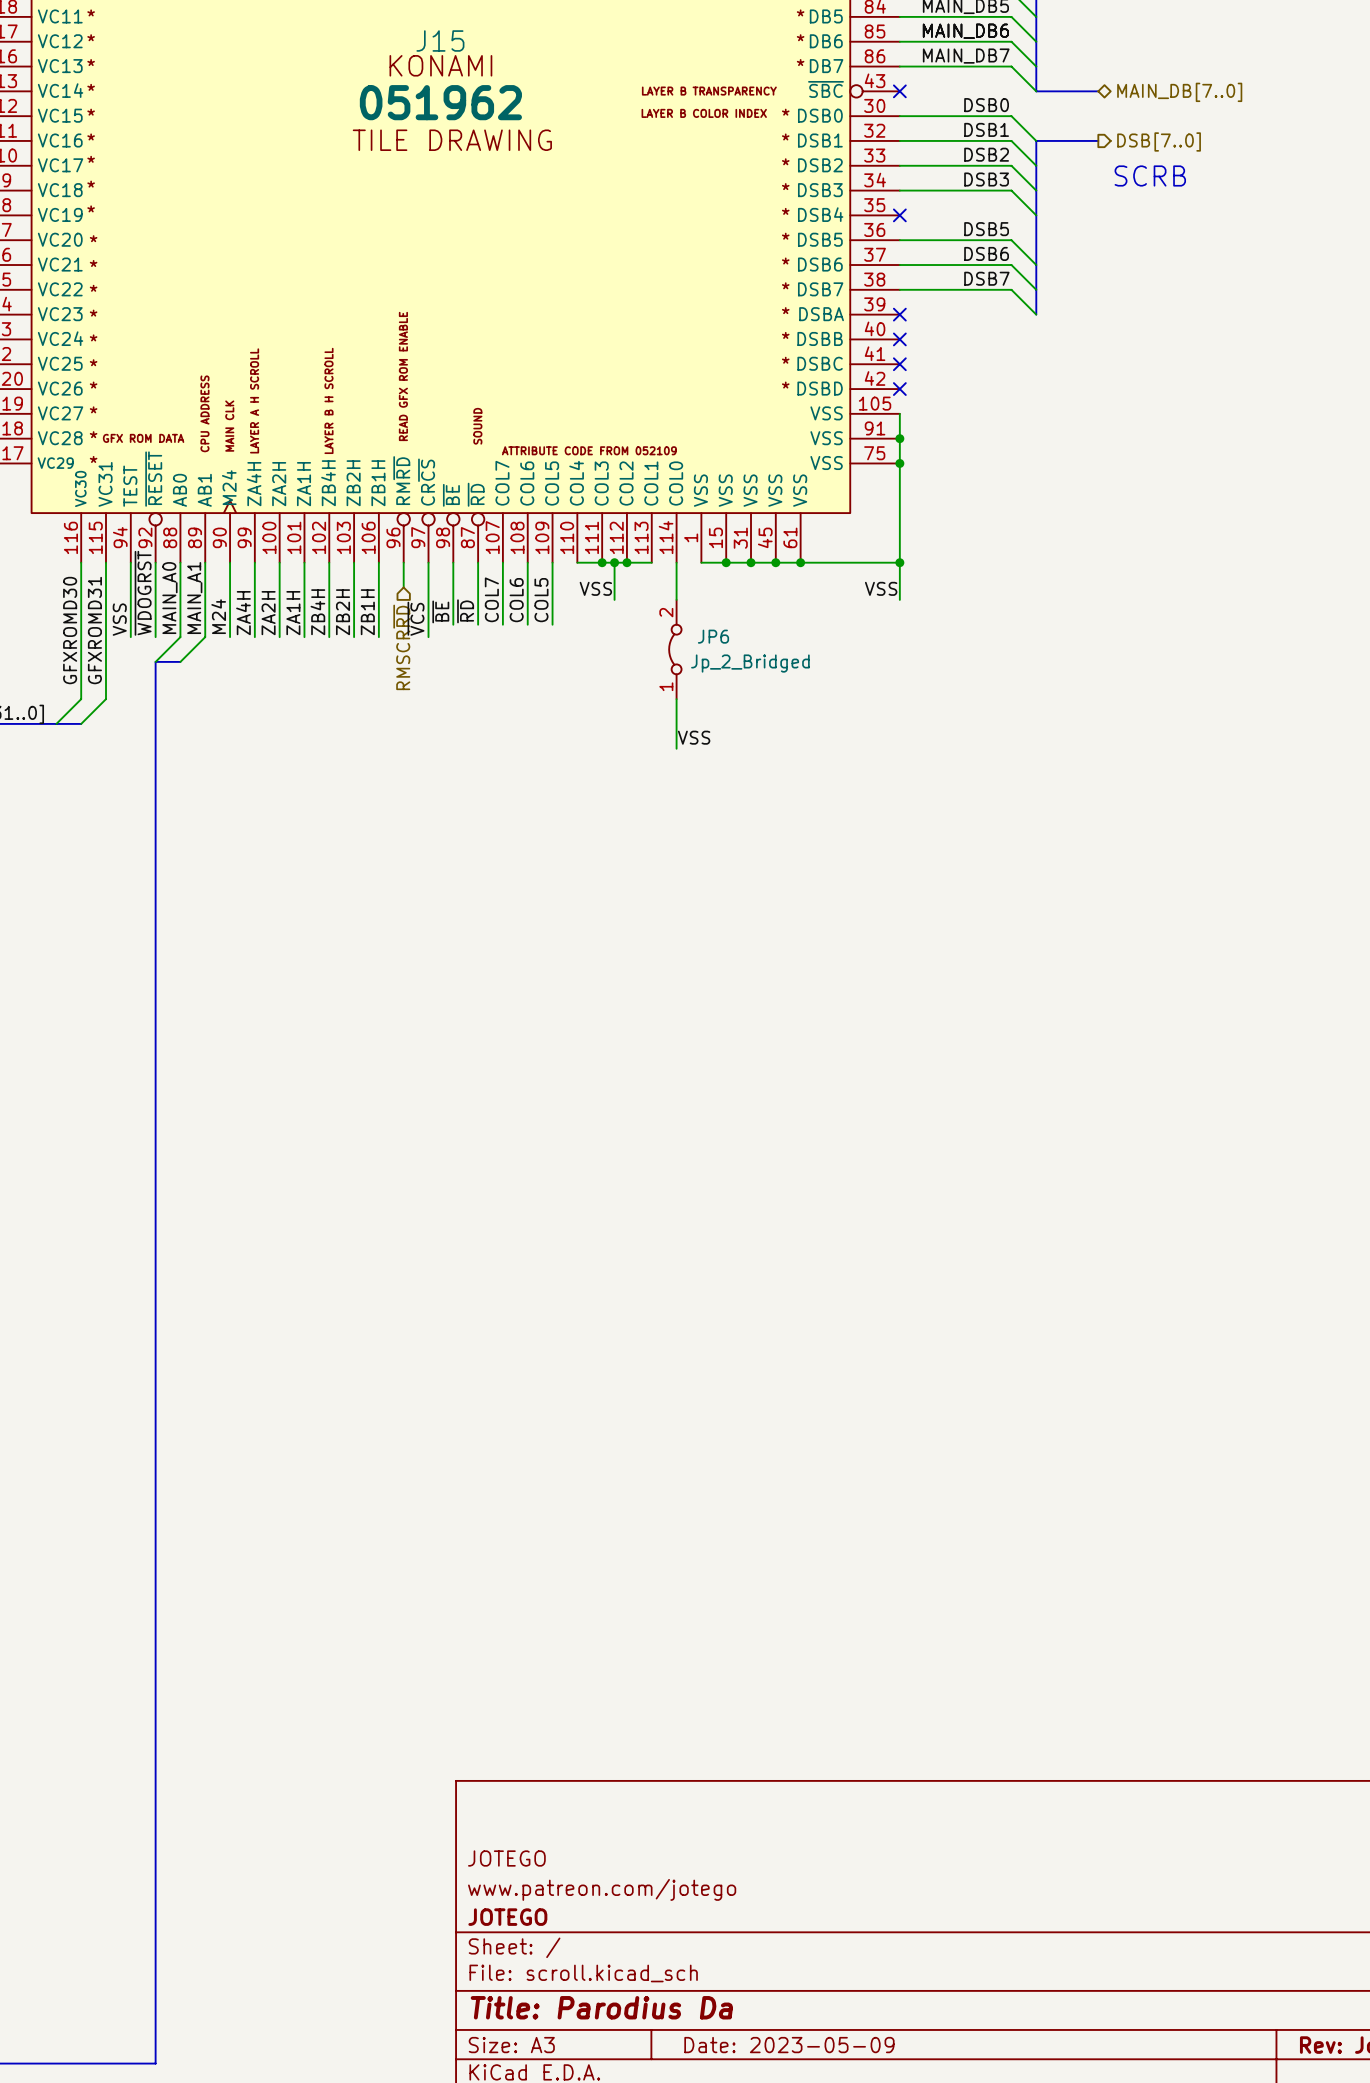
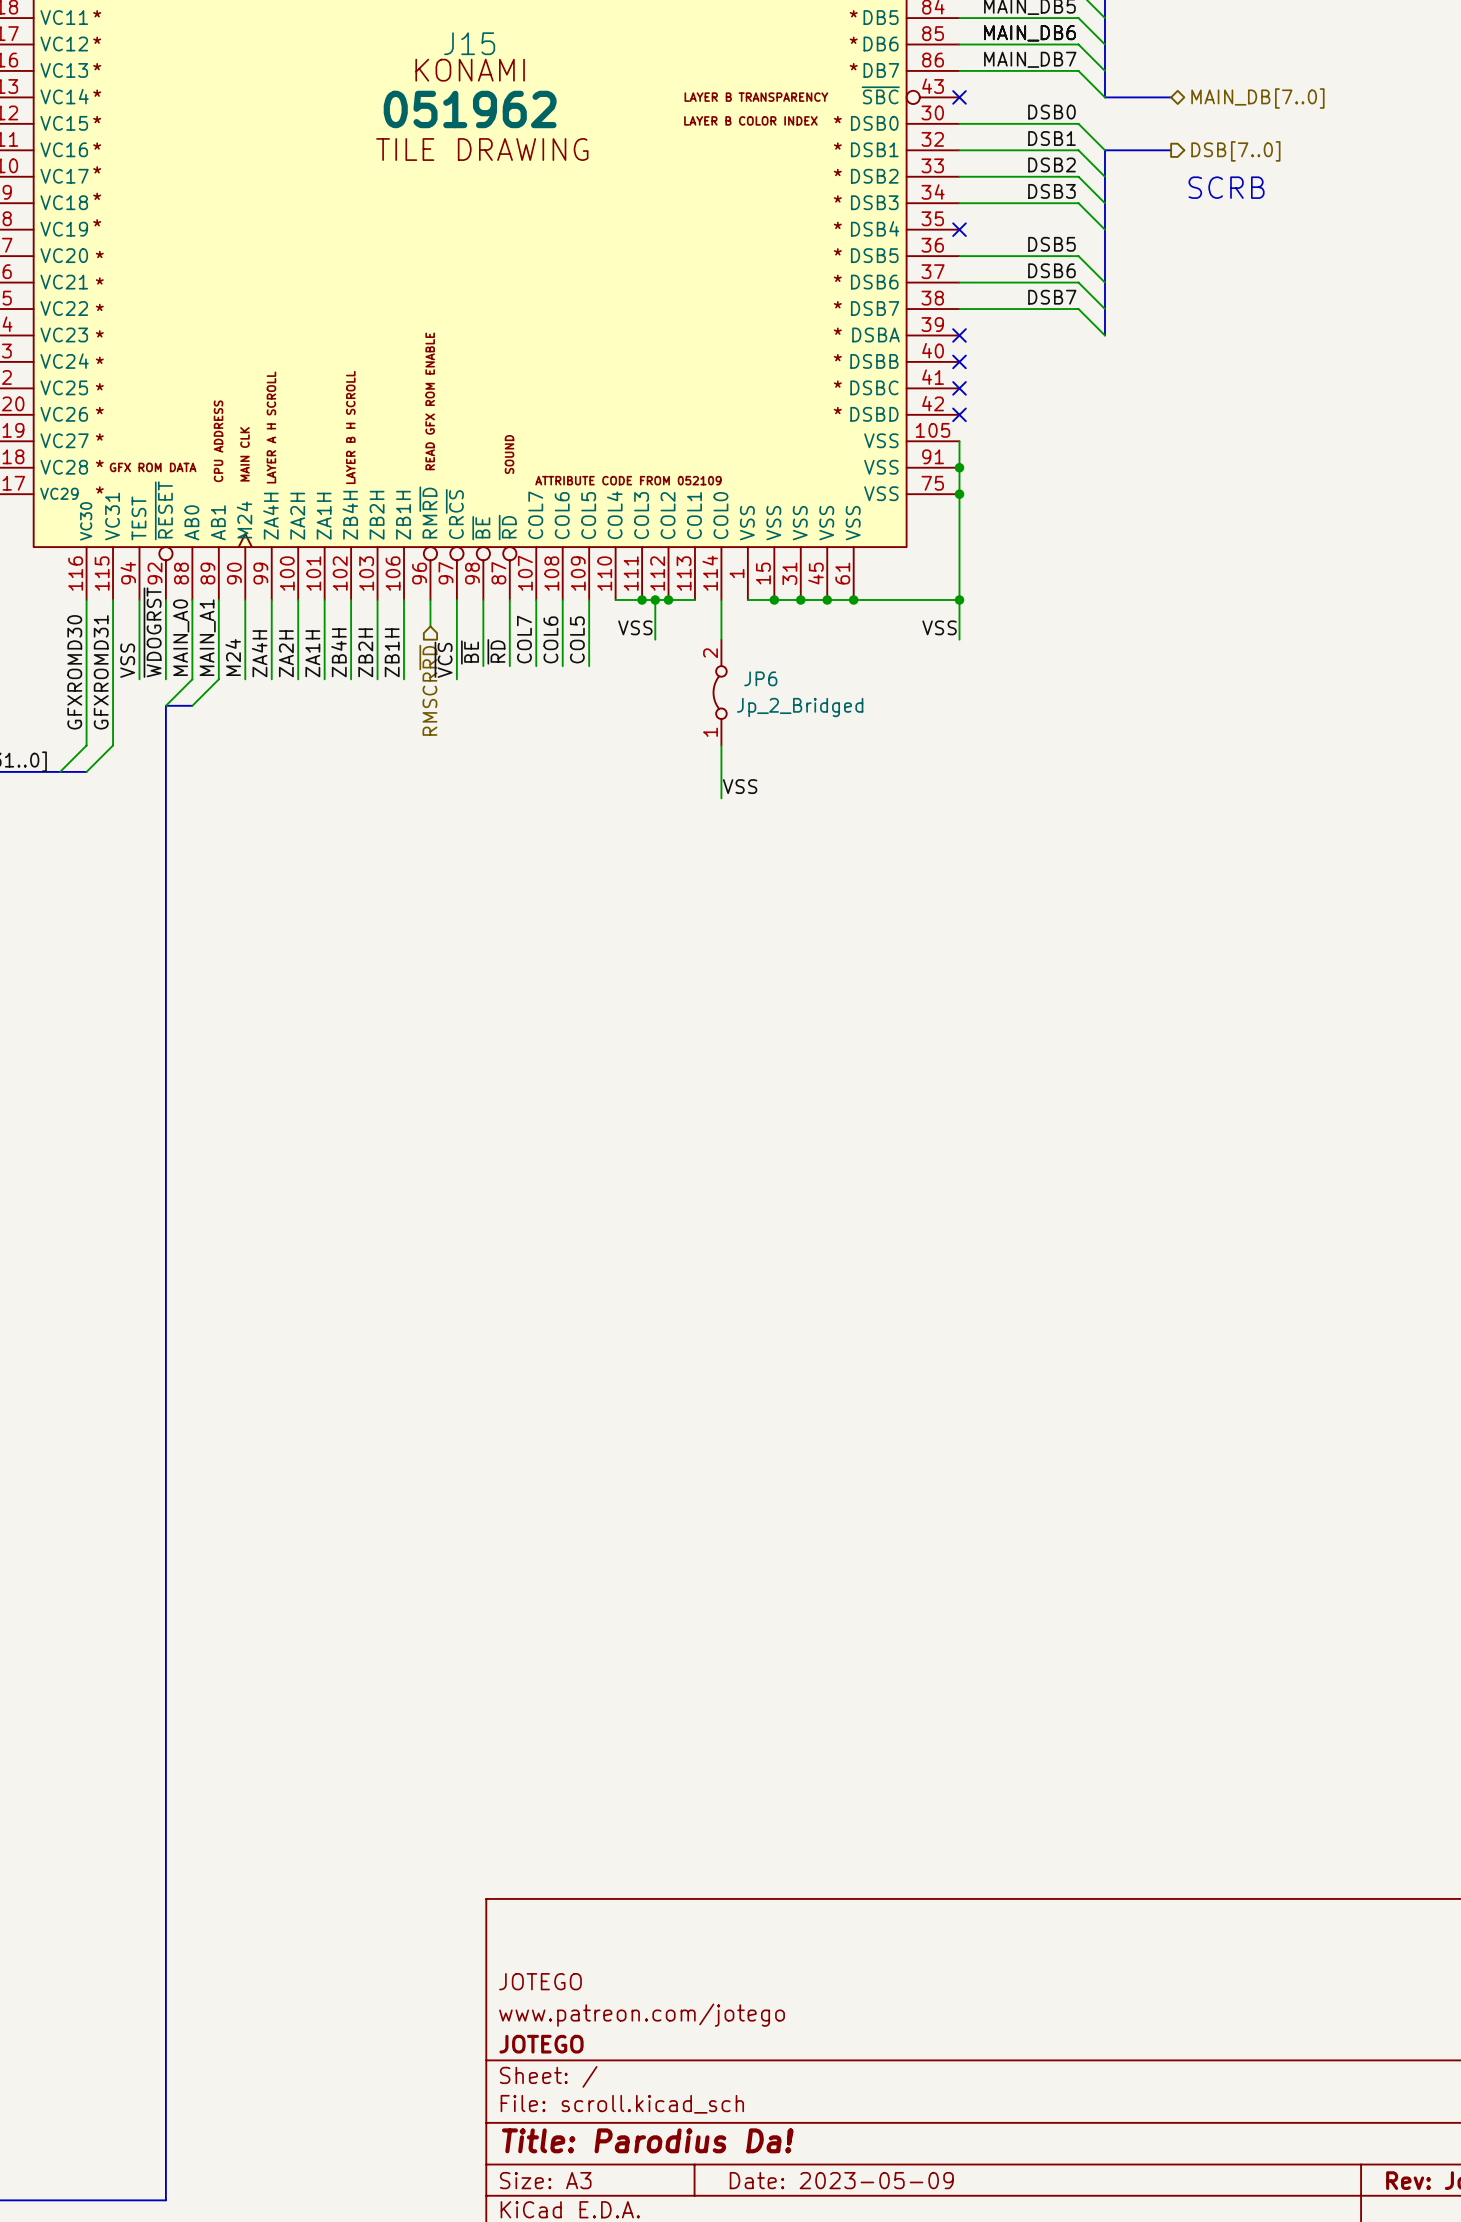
title block: Title: Parodius Da (601, 2007) -> Title: Parodius Da! (647, 2140)

